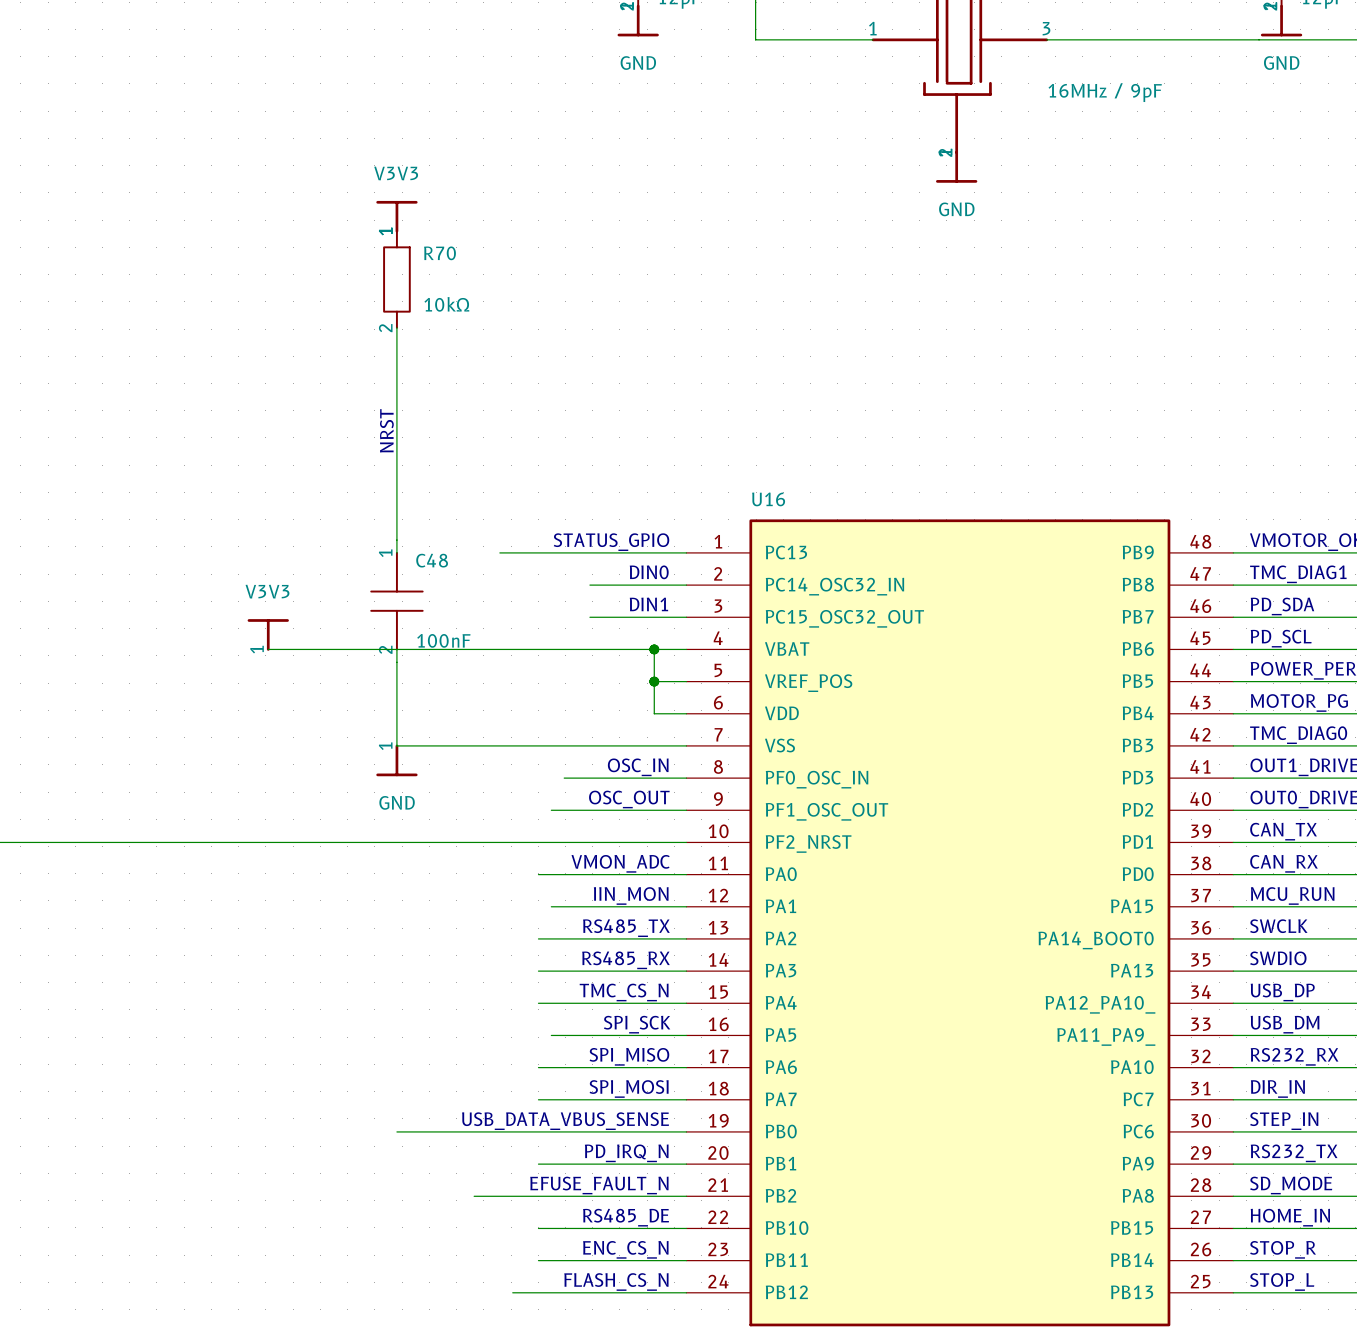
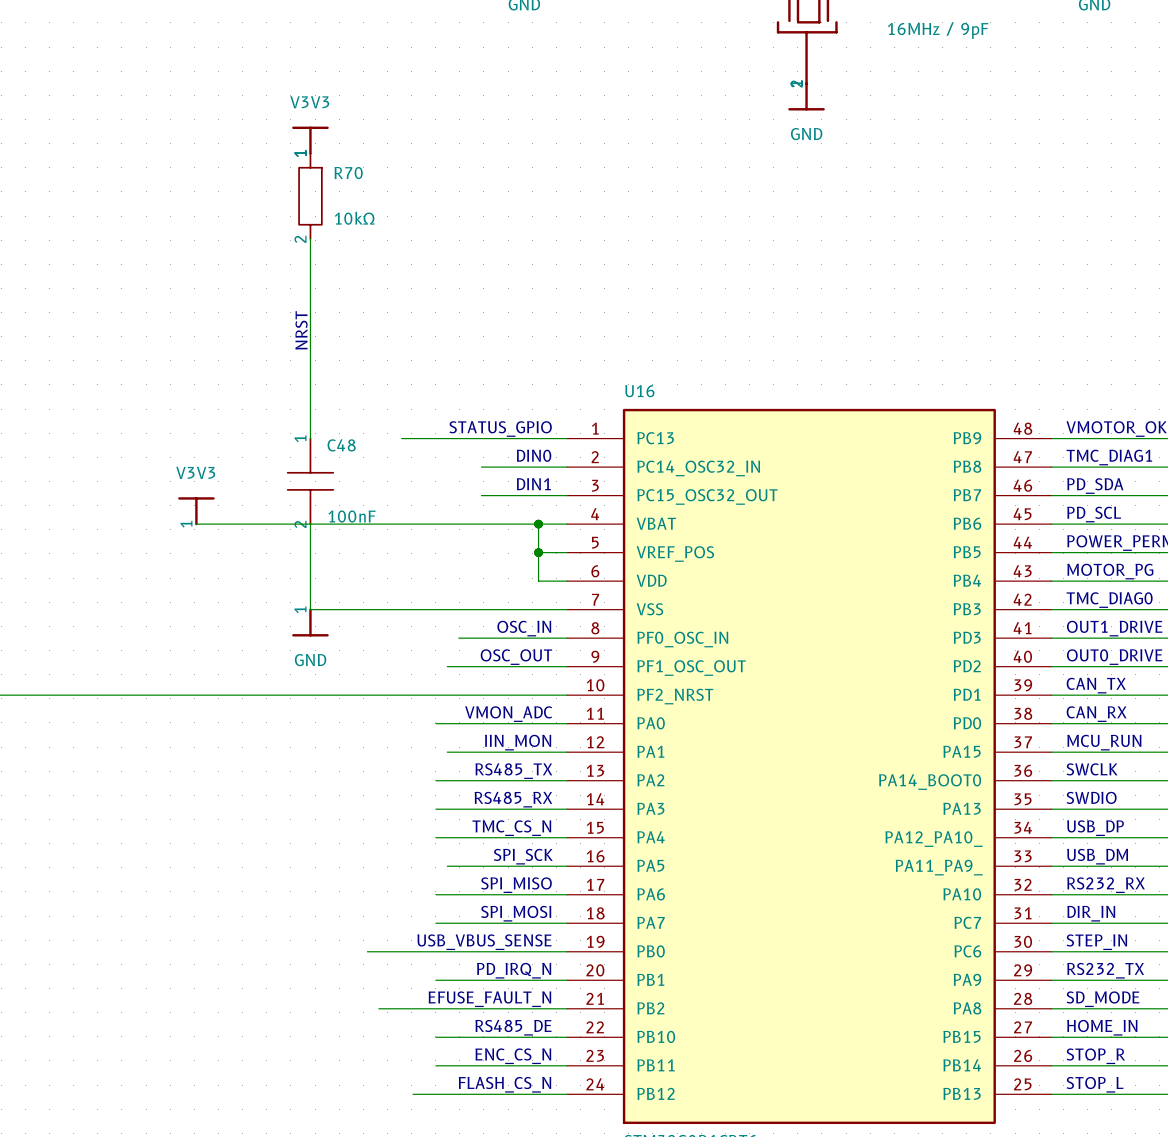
text: USB_DATA_VBUS_SENSE (565, 1121) -> USB_VBUS_SENSE (484, 942)
wire: (396, 1131) (461, 1131) -> none

